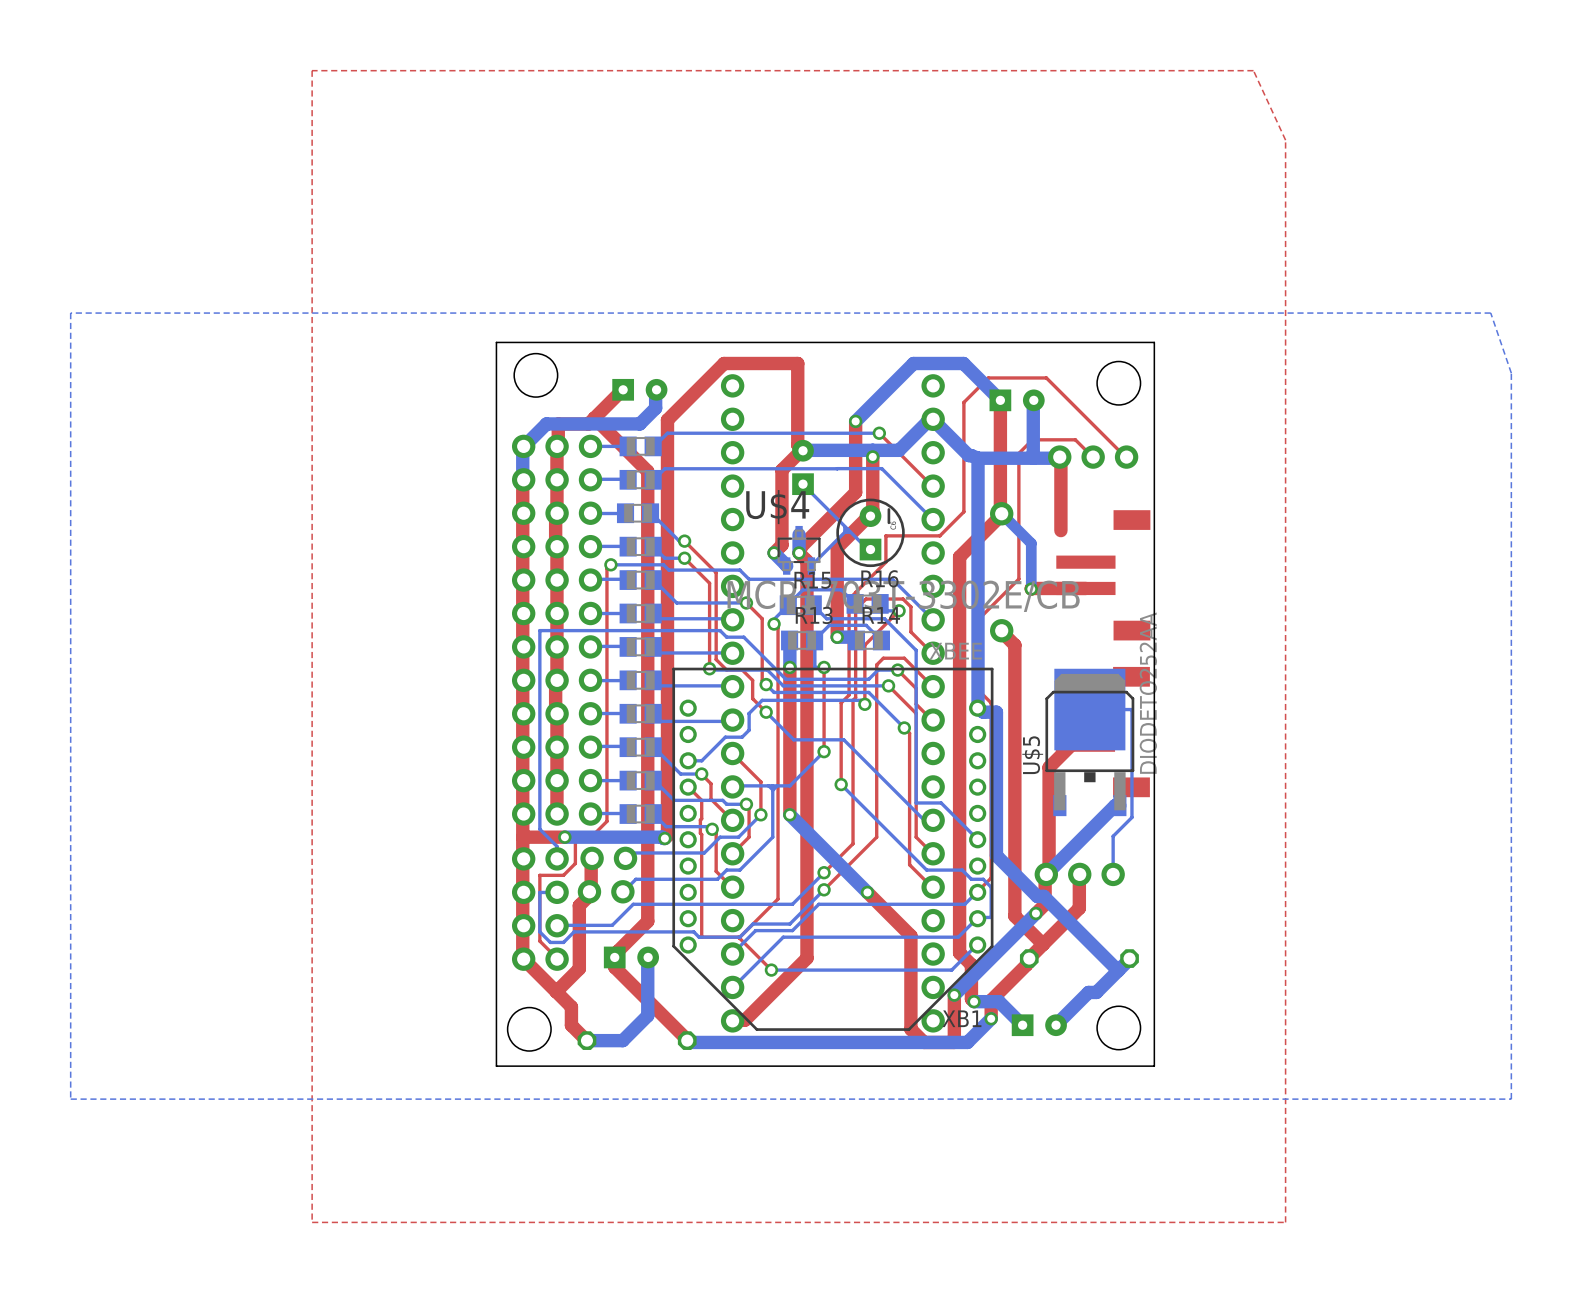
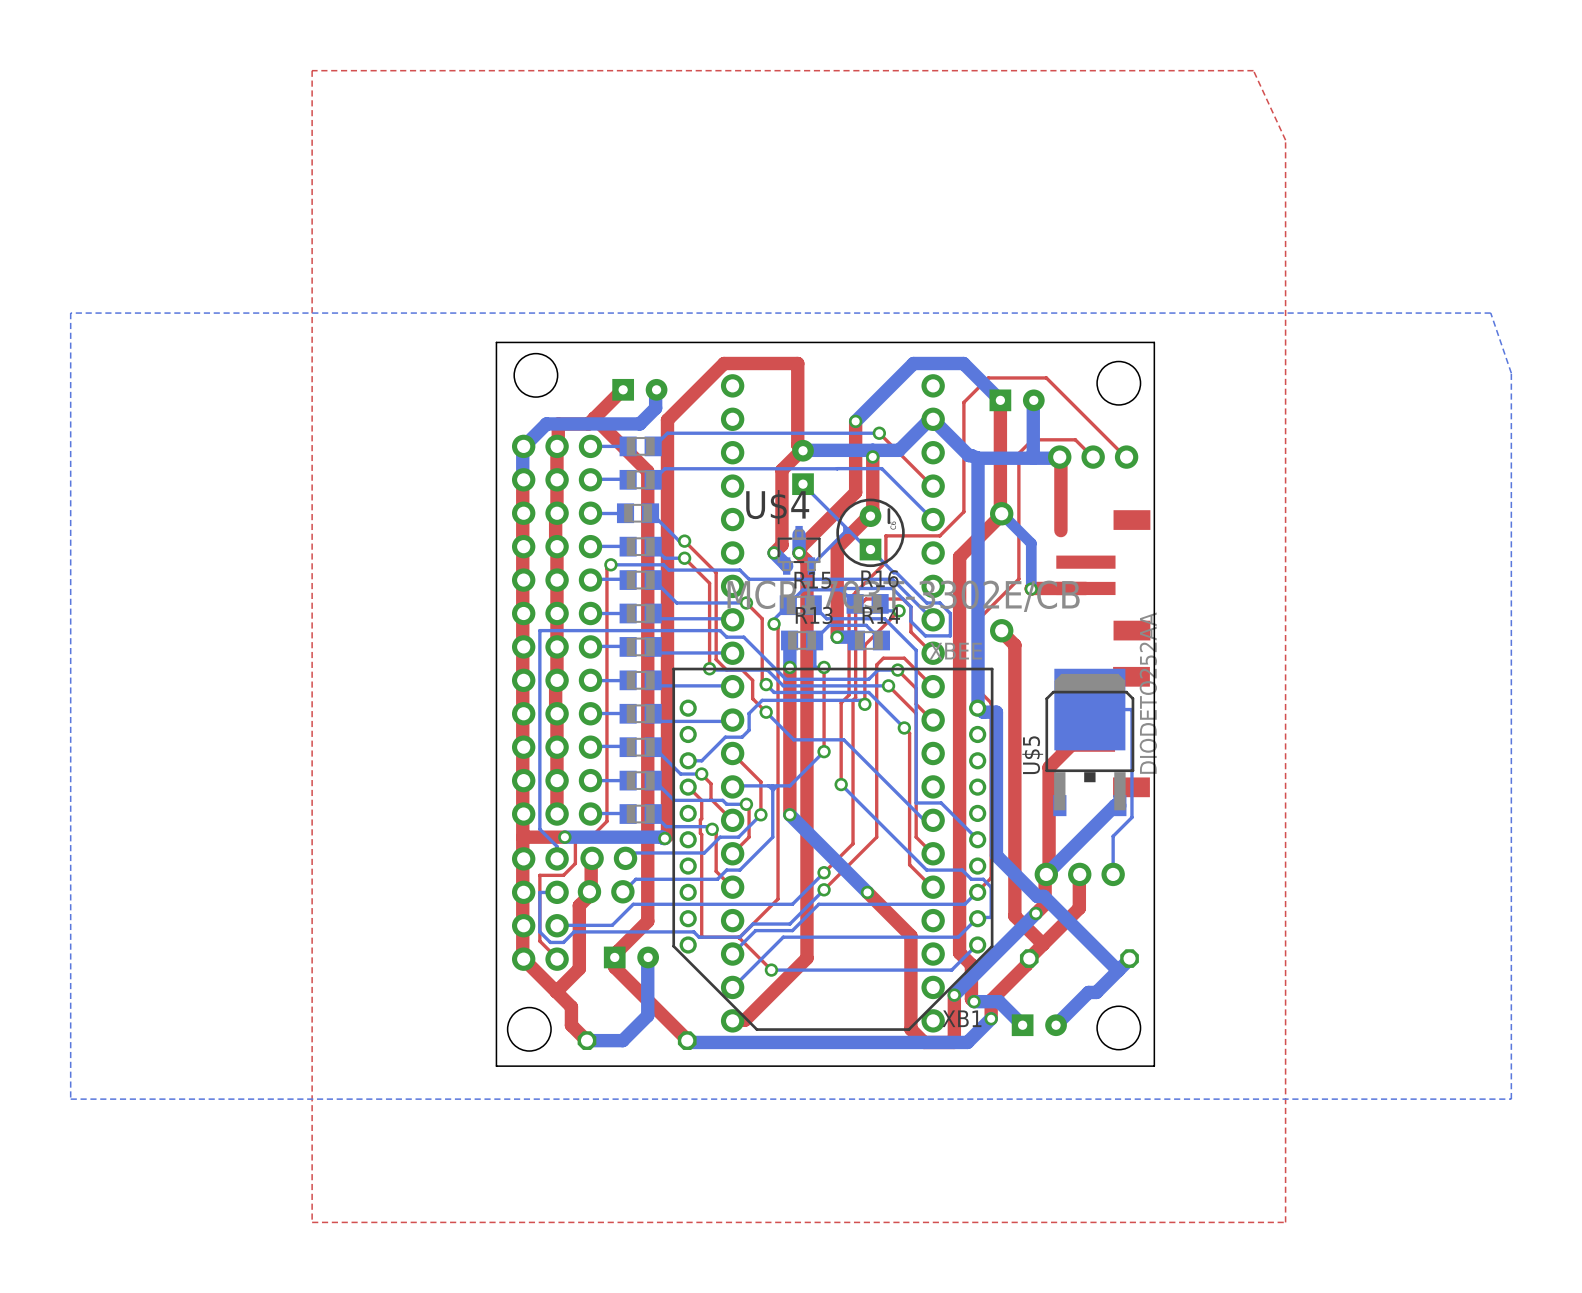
bottom track: none -> (870, 549) (926, 602) (939, 602) (950, 613) (950, 635) (925, 635) (910, 621) (910, 606) (892, 588) (841, 589)

